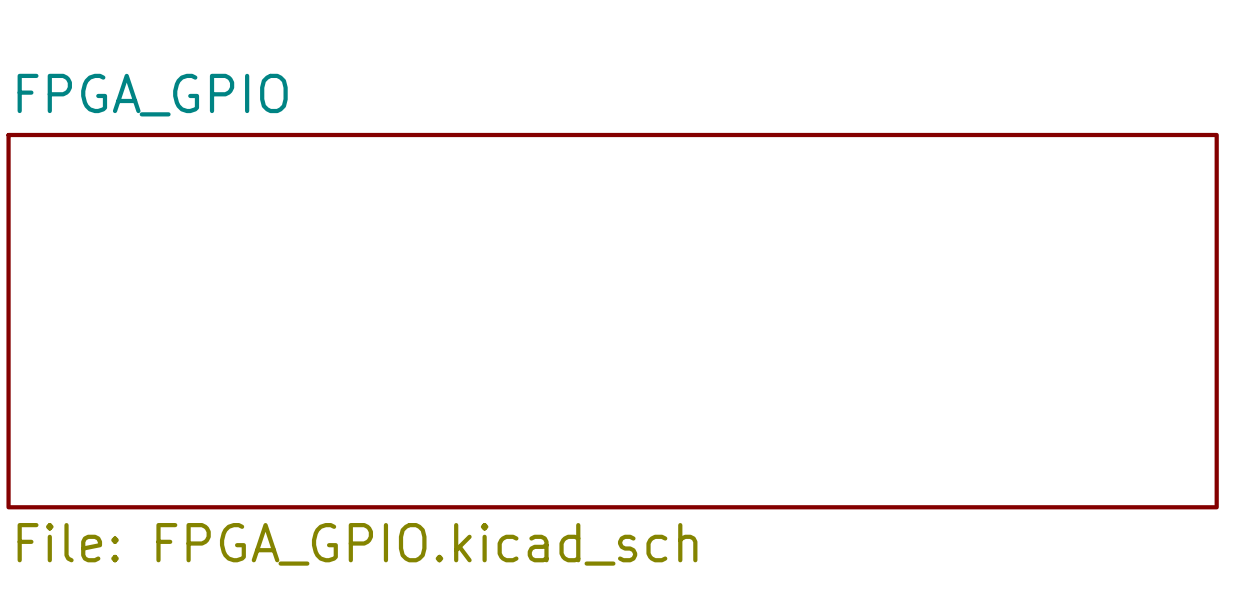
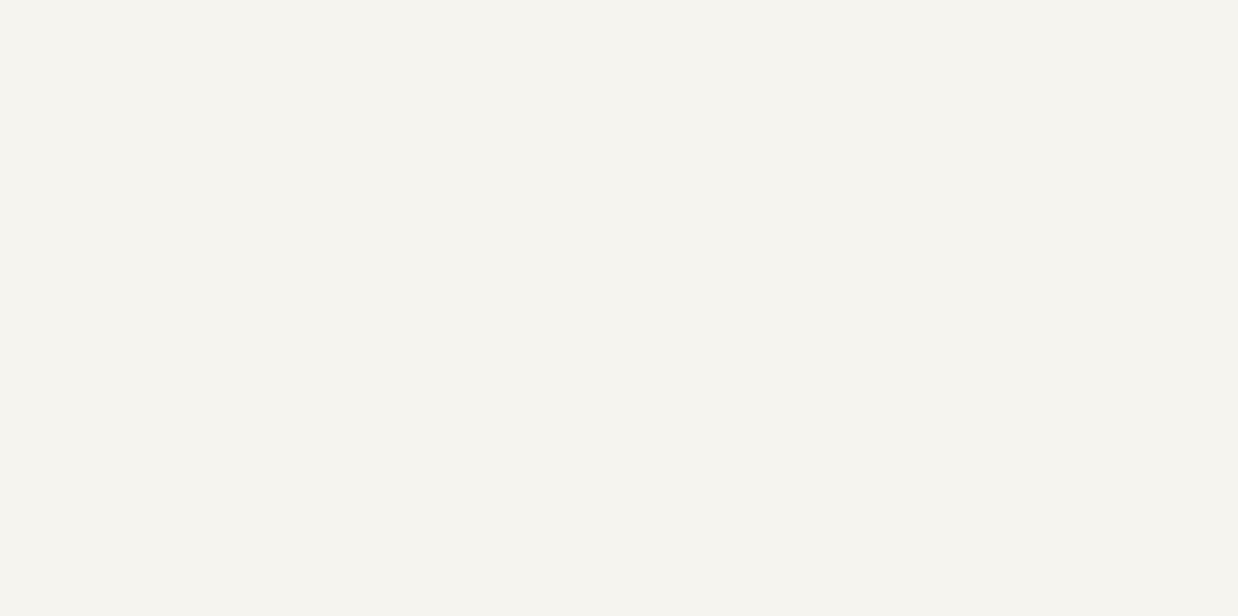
sheet FPGA_GPIO: File: FPGA_GPIO.kicad_sch (612, 321) -> none

